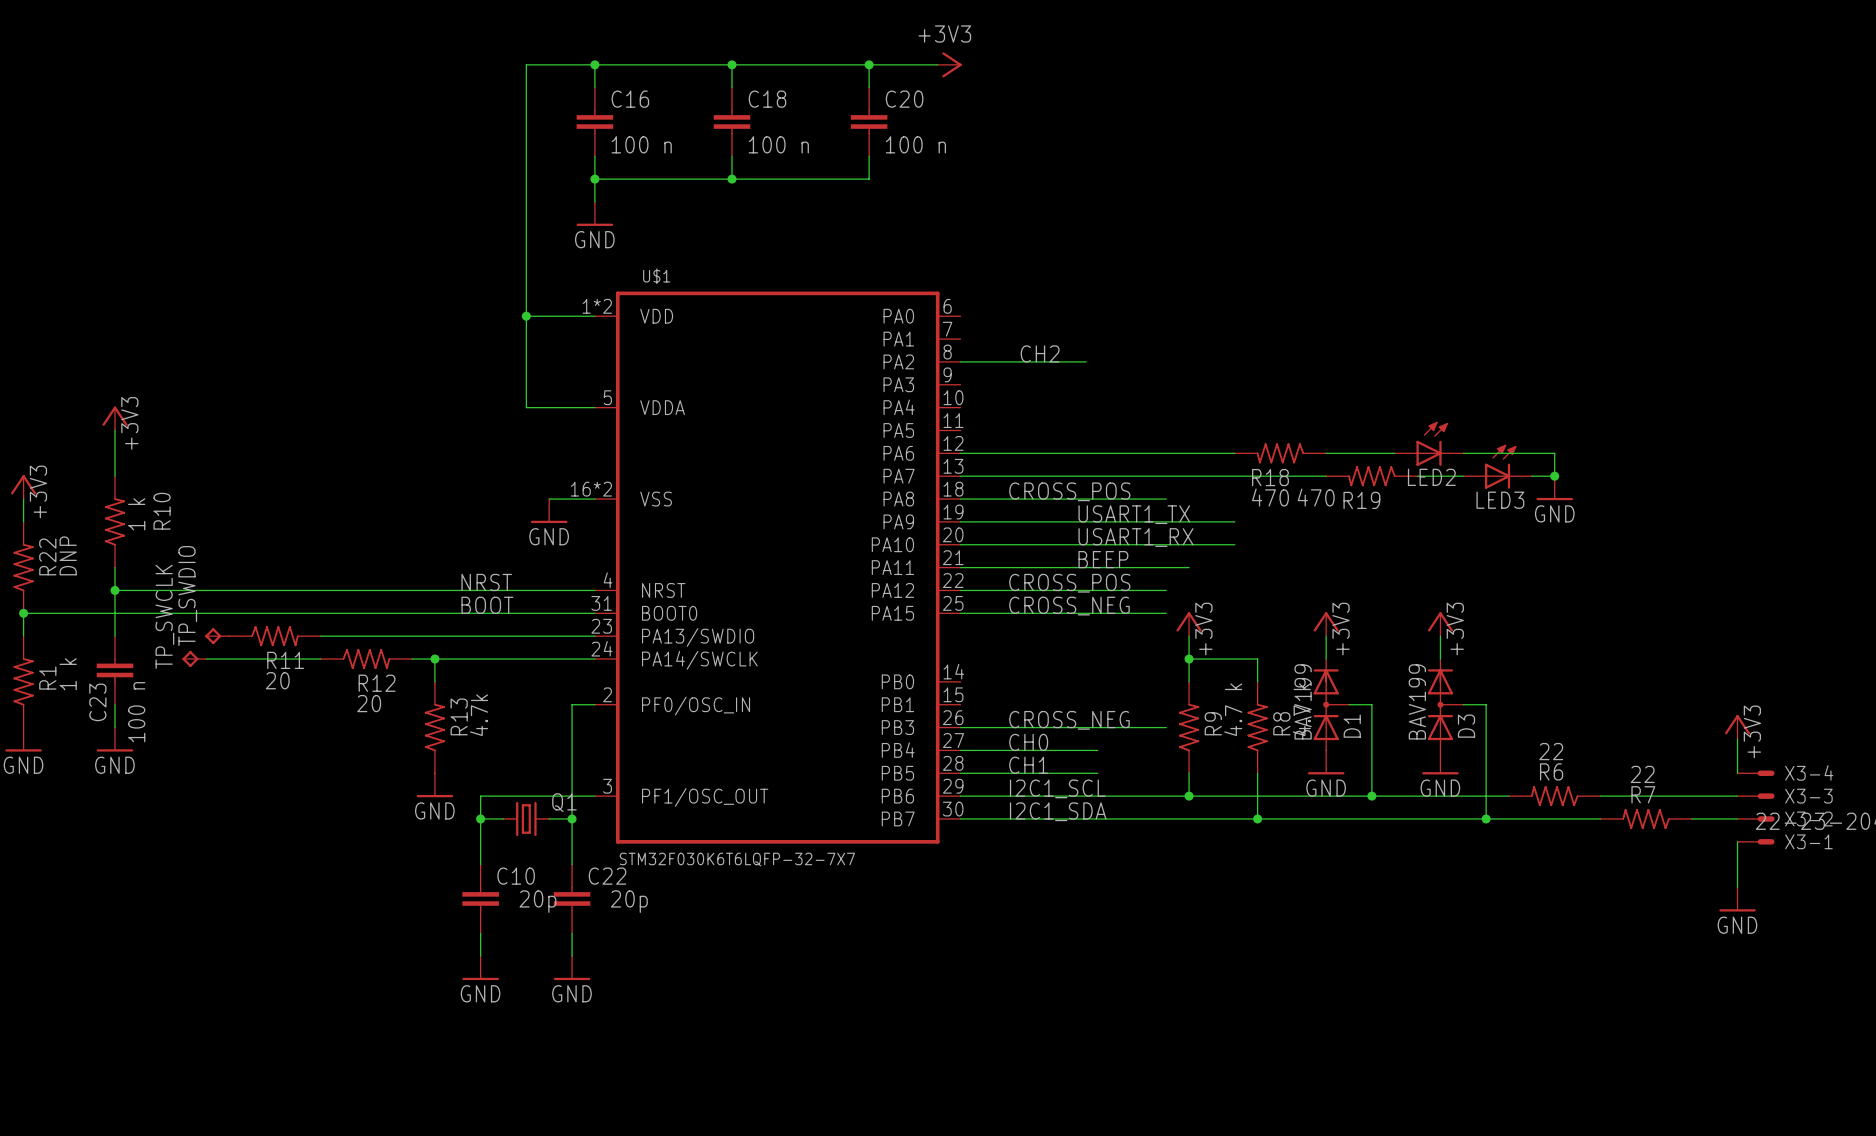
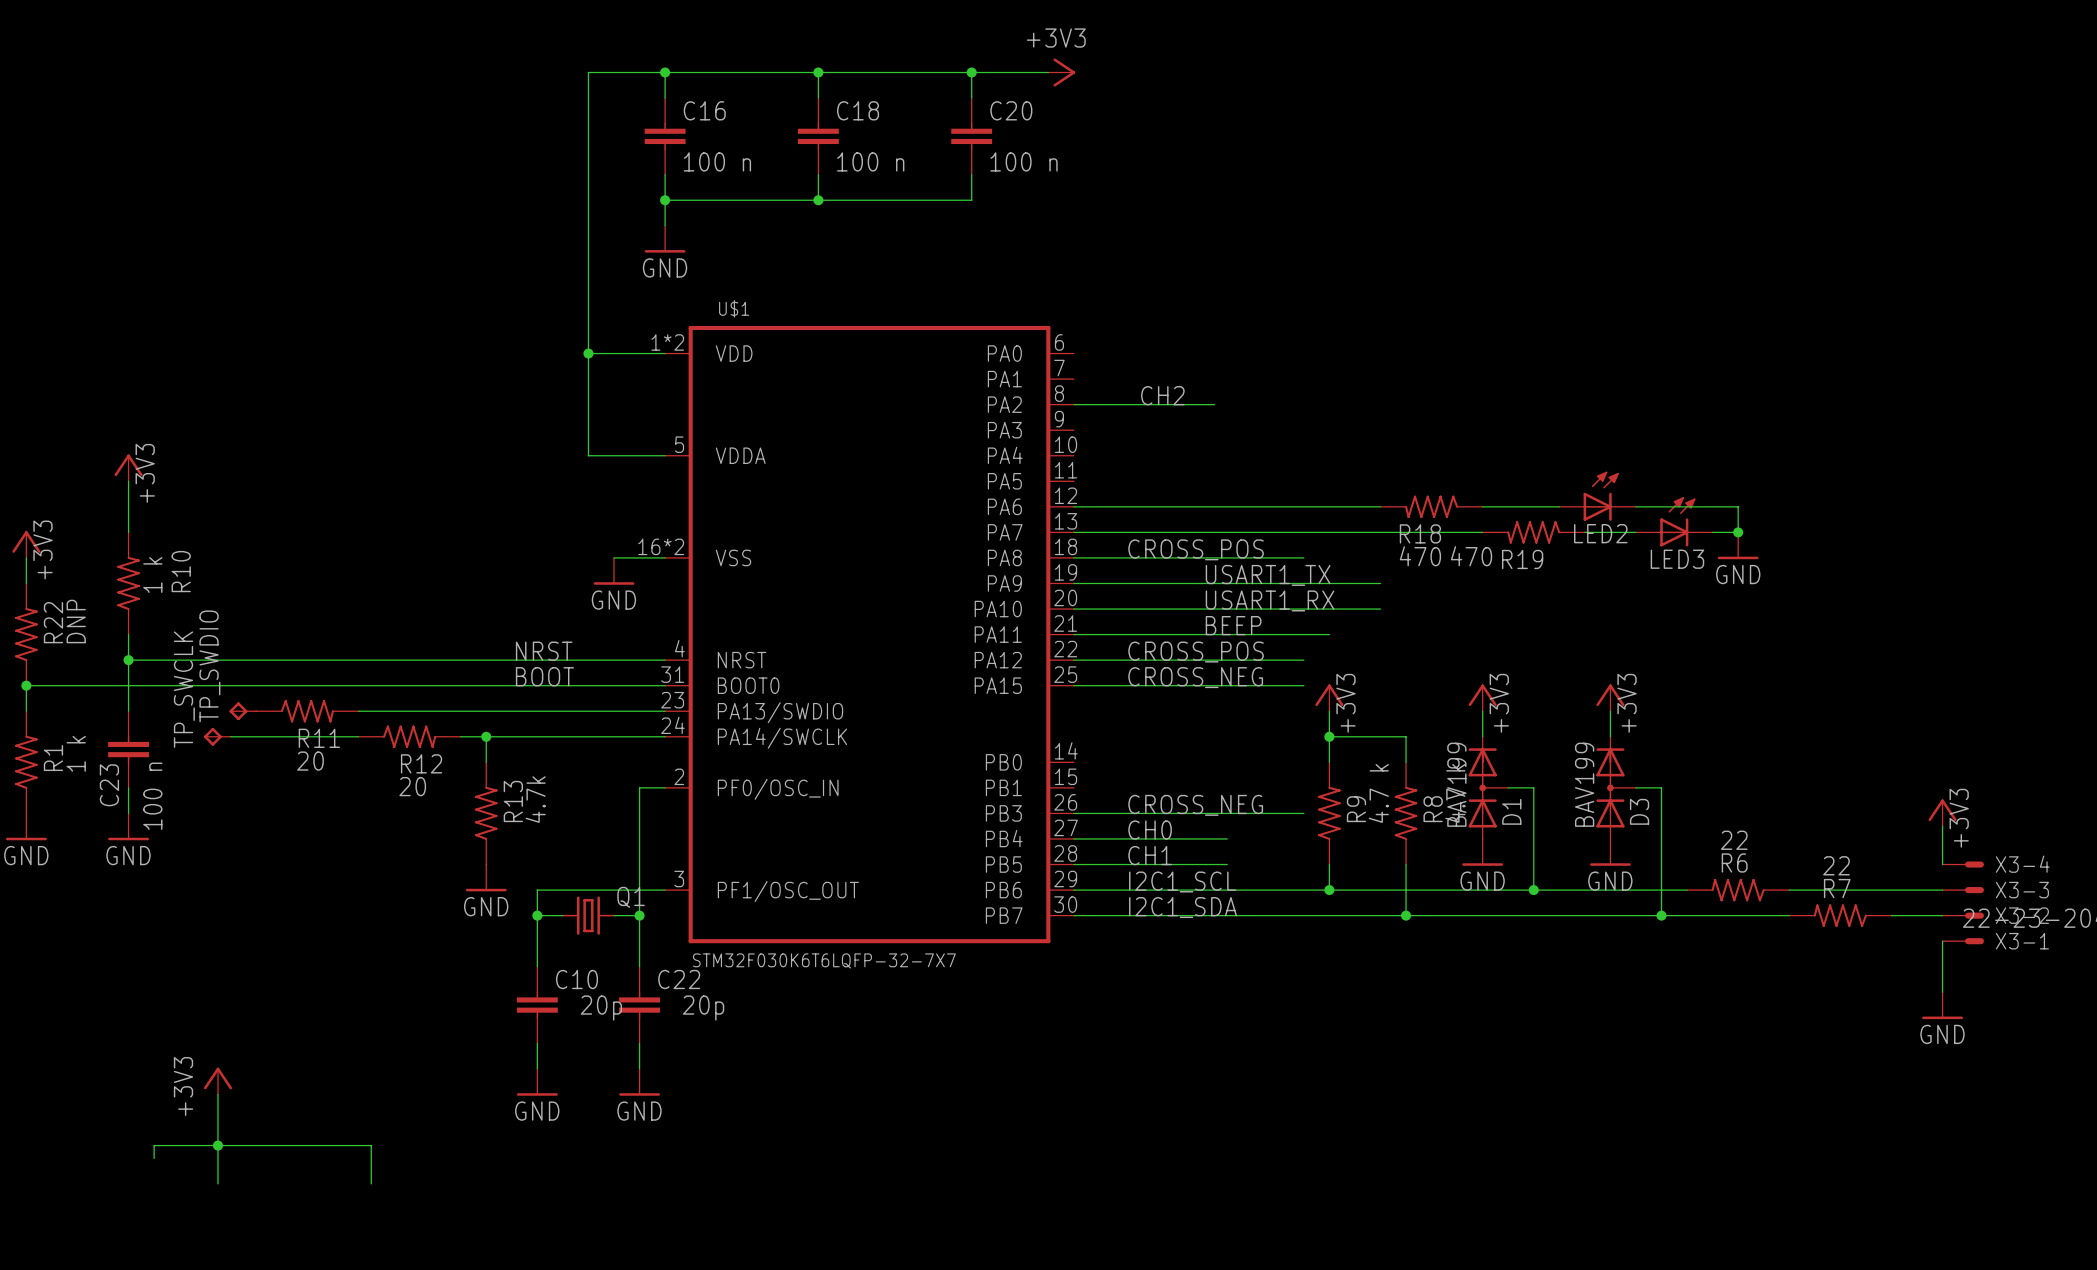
power symbol: none -> +3V3 (217, 1081)
wire: none -> (217, 1094) (217, 1183)
junction: none -> (217, 1145)
wire: none -> (154, 1158) (154, 1145) (371, 1145) (371, 1183)

